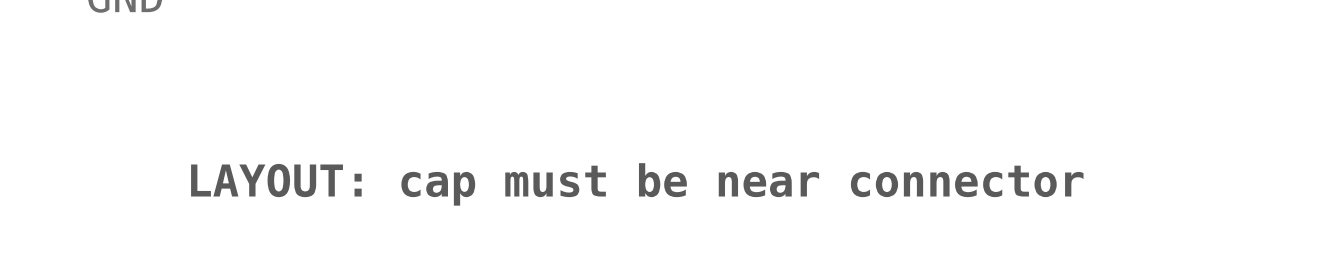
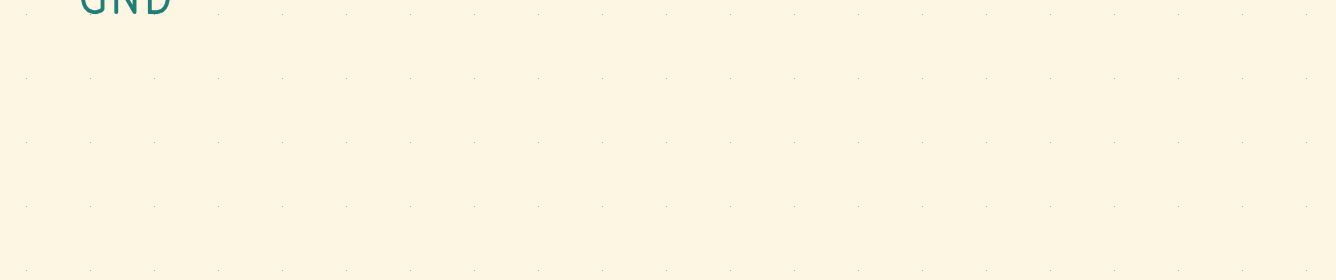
text: LAYOUT: cap must be near connector (637, 184) -> none

